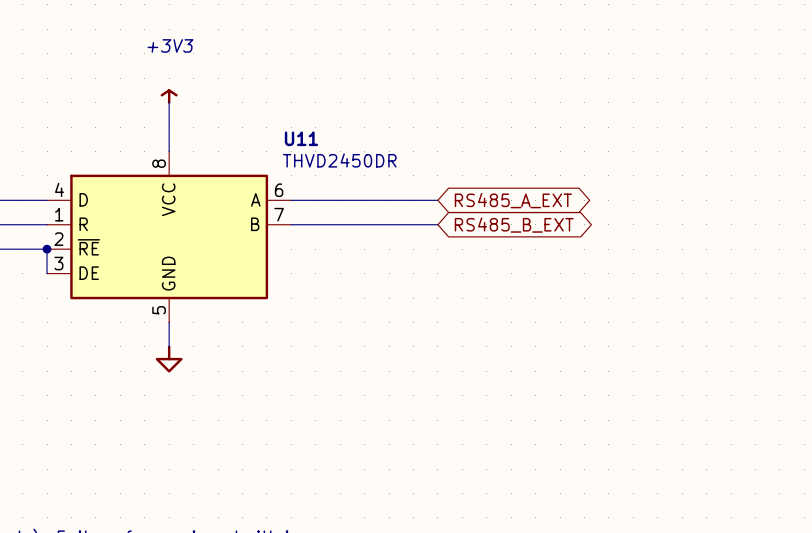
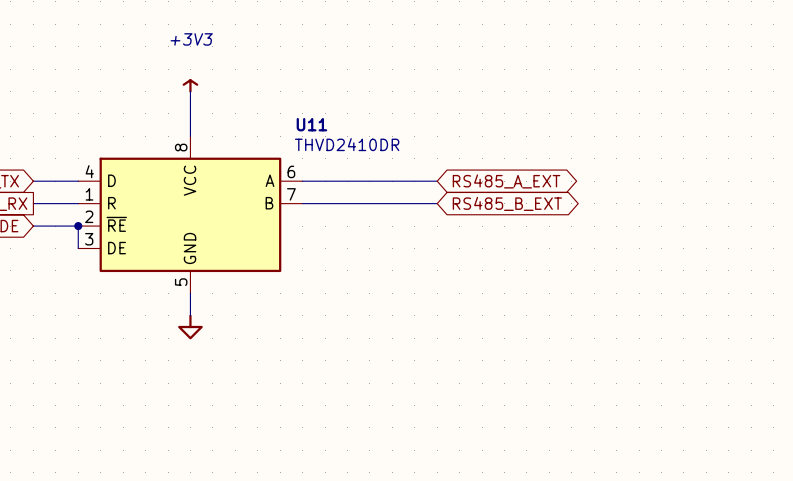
U11 value: THVD2450DR (339, 160) -> THVD2410DR (347, 144)

